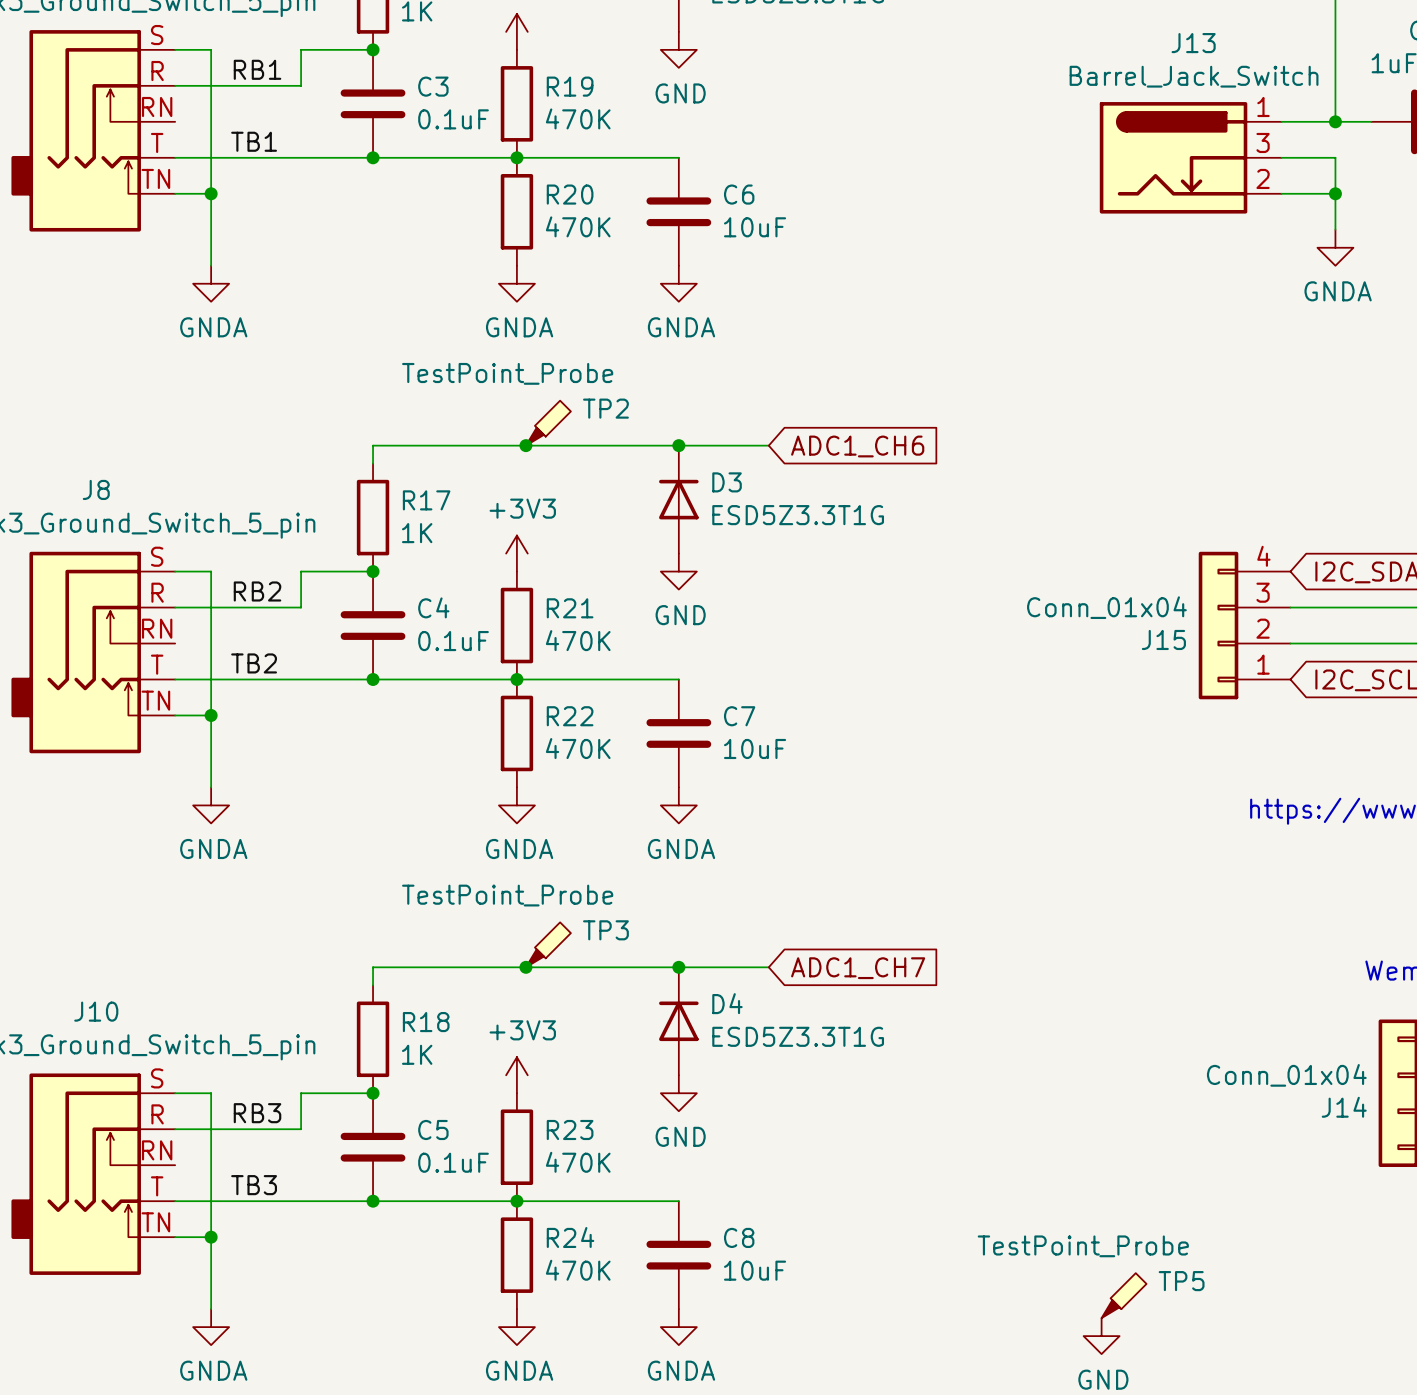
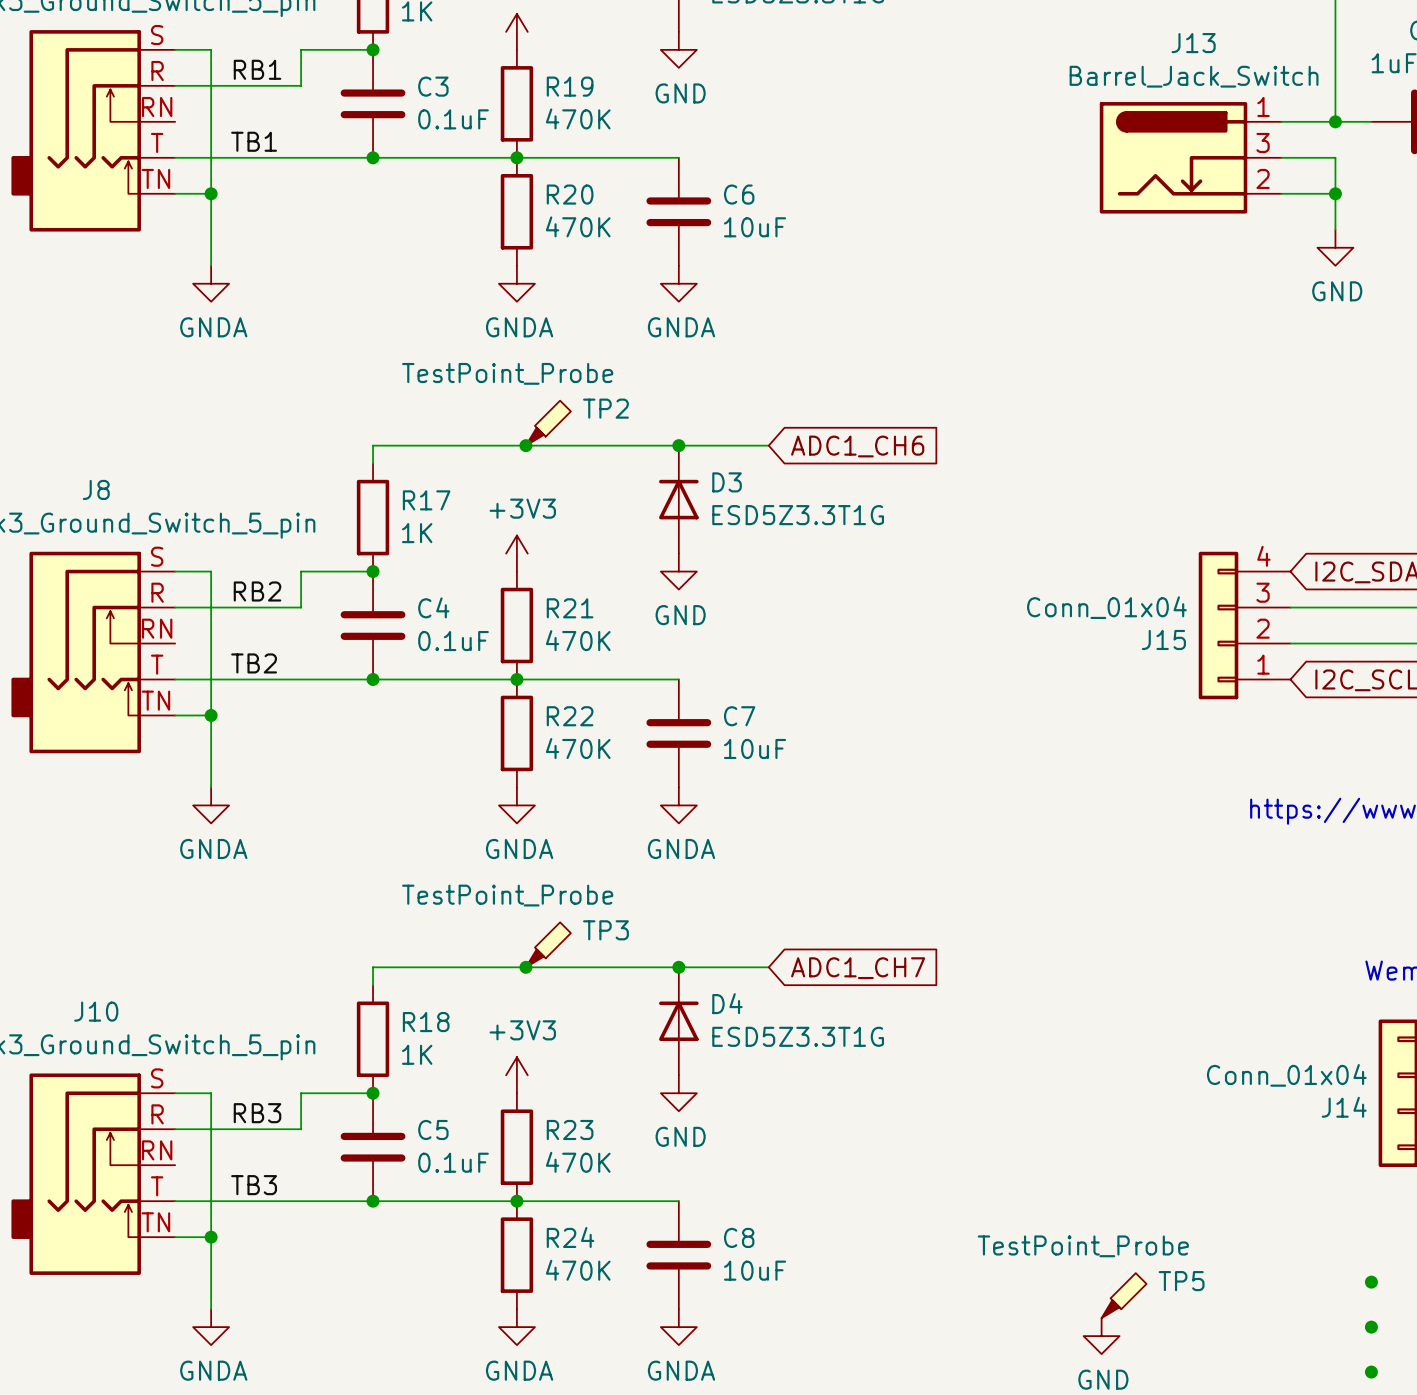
power symbol: GNDA (1335, 247) -> GND (1335, 247)
junction: none -> (1371, 1282)
junction: none -> (1371, 1327)
junction: none -> (1371, 1372)

